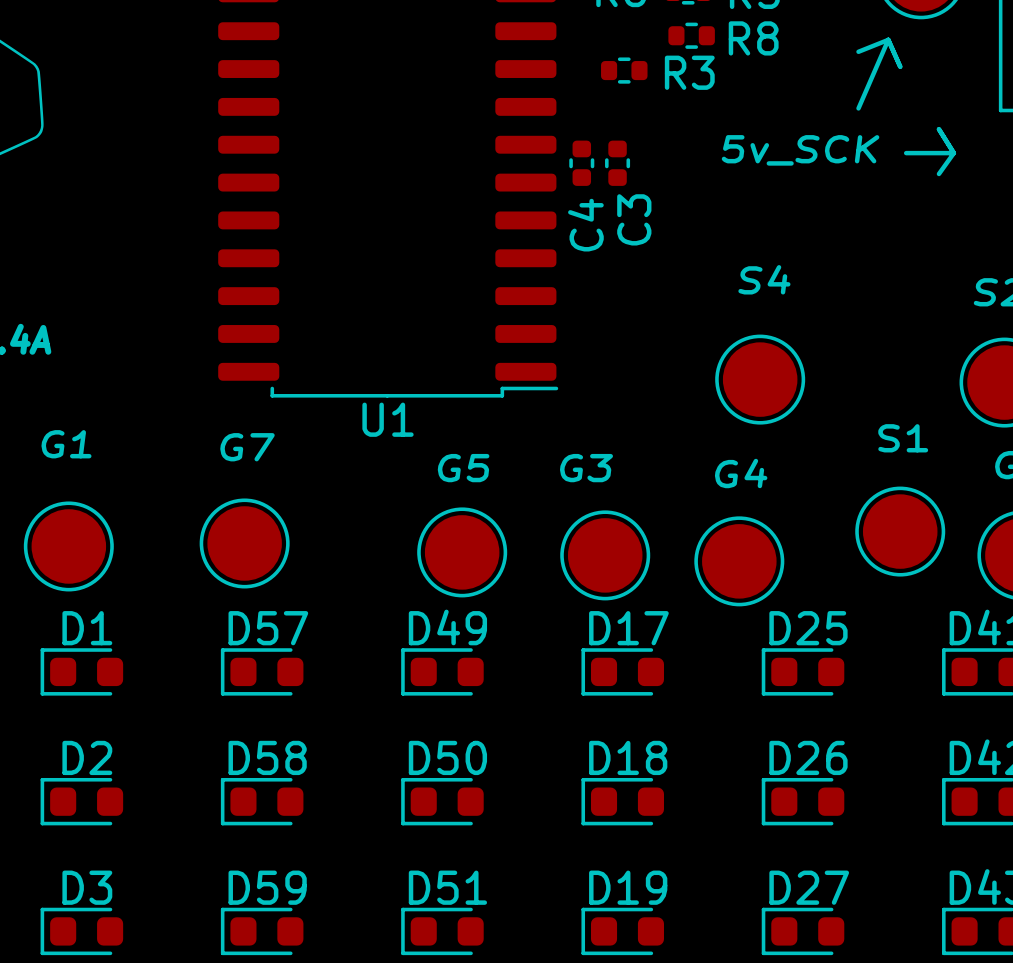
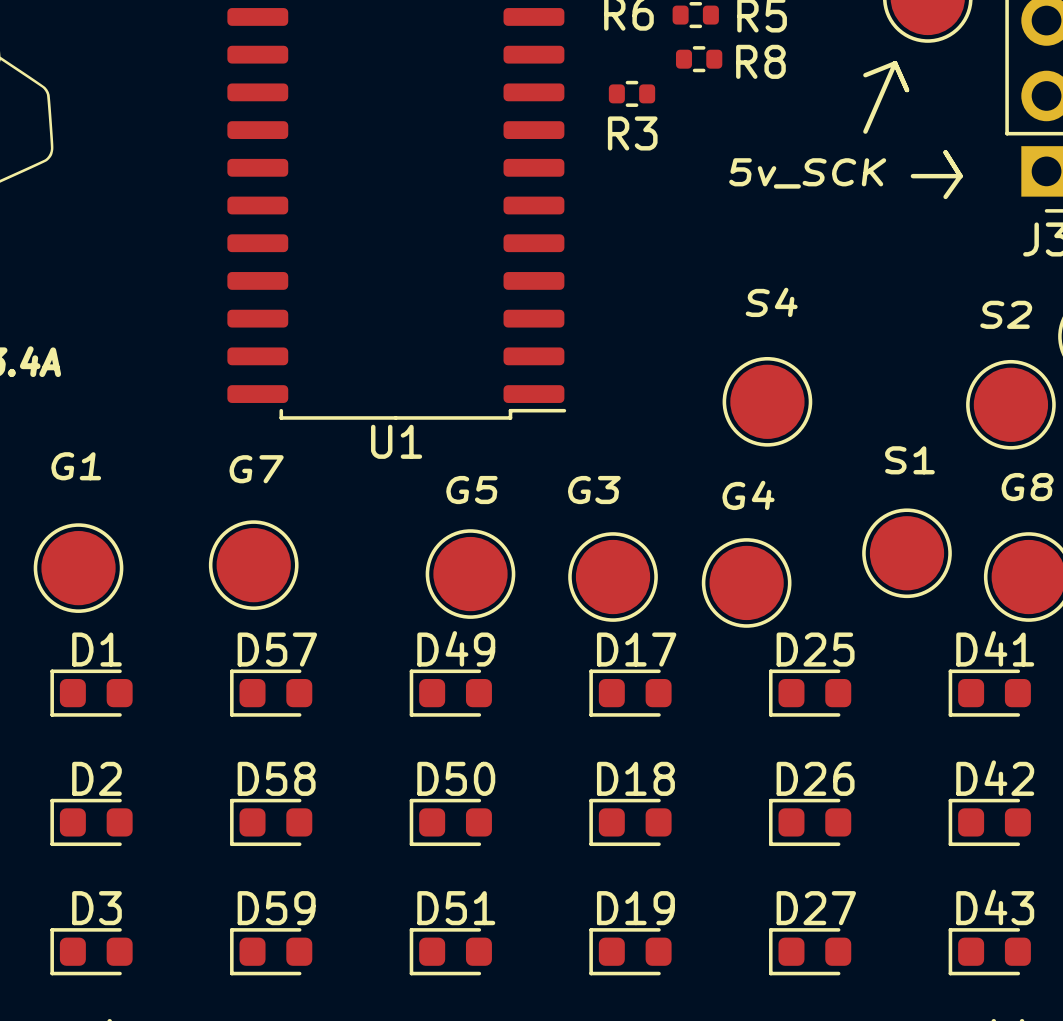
R3 name position: R3 (689, 72) -> R3 (632, 133)
C4: (581, 163) -> none
C3: (617, 163) -> none

